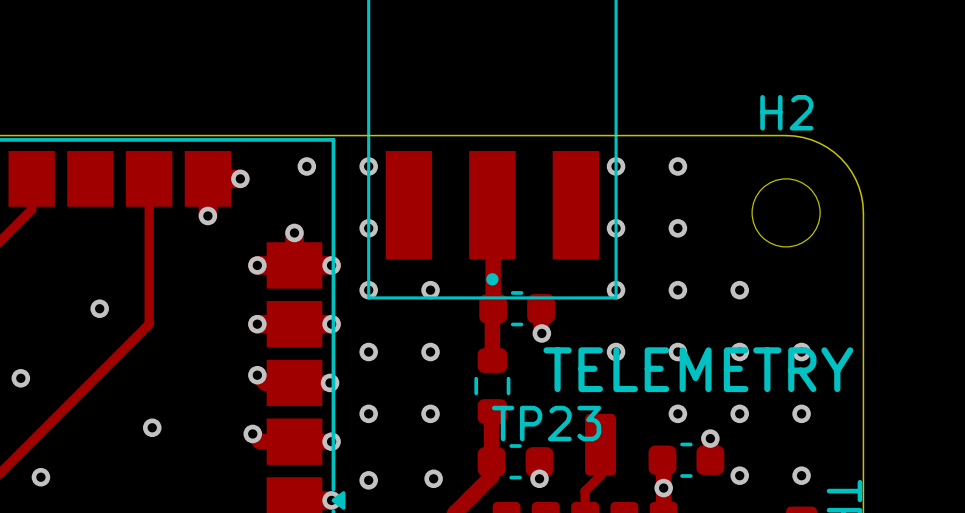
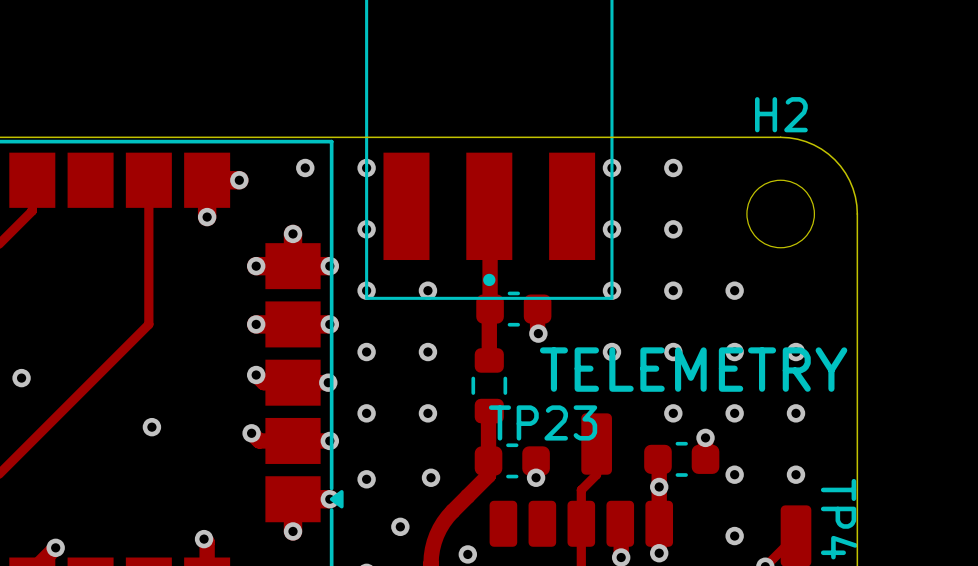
via: (99, 308) -> none
via: (40, 477) -> none

